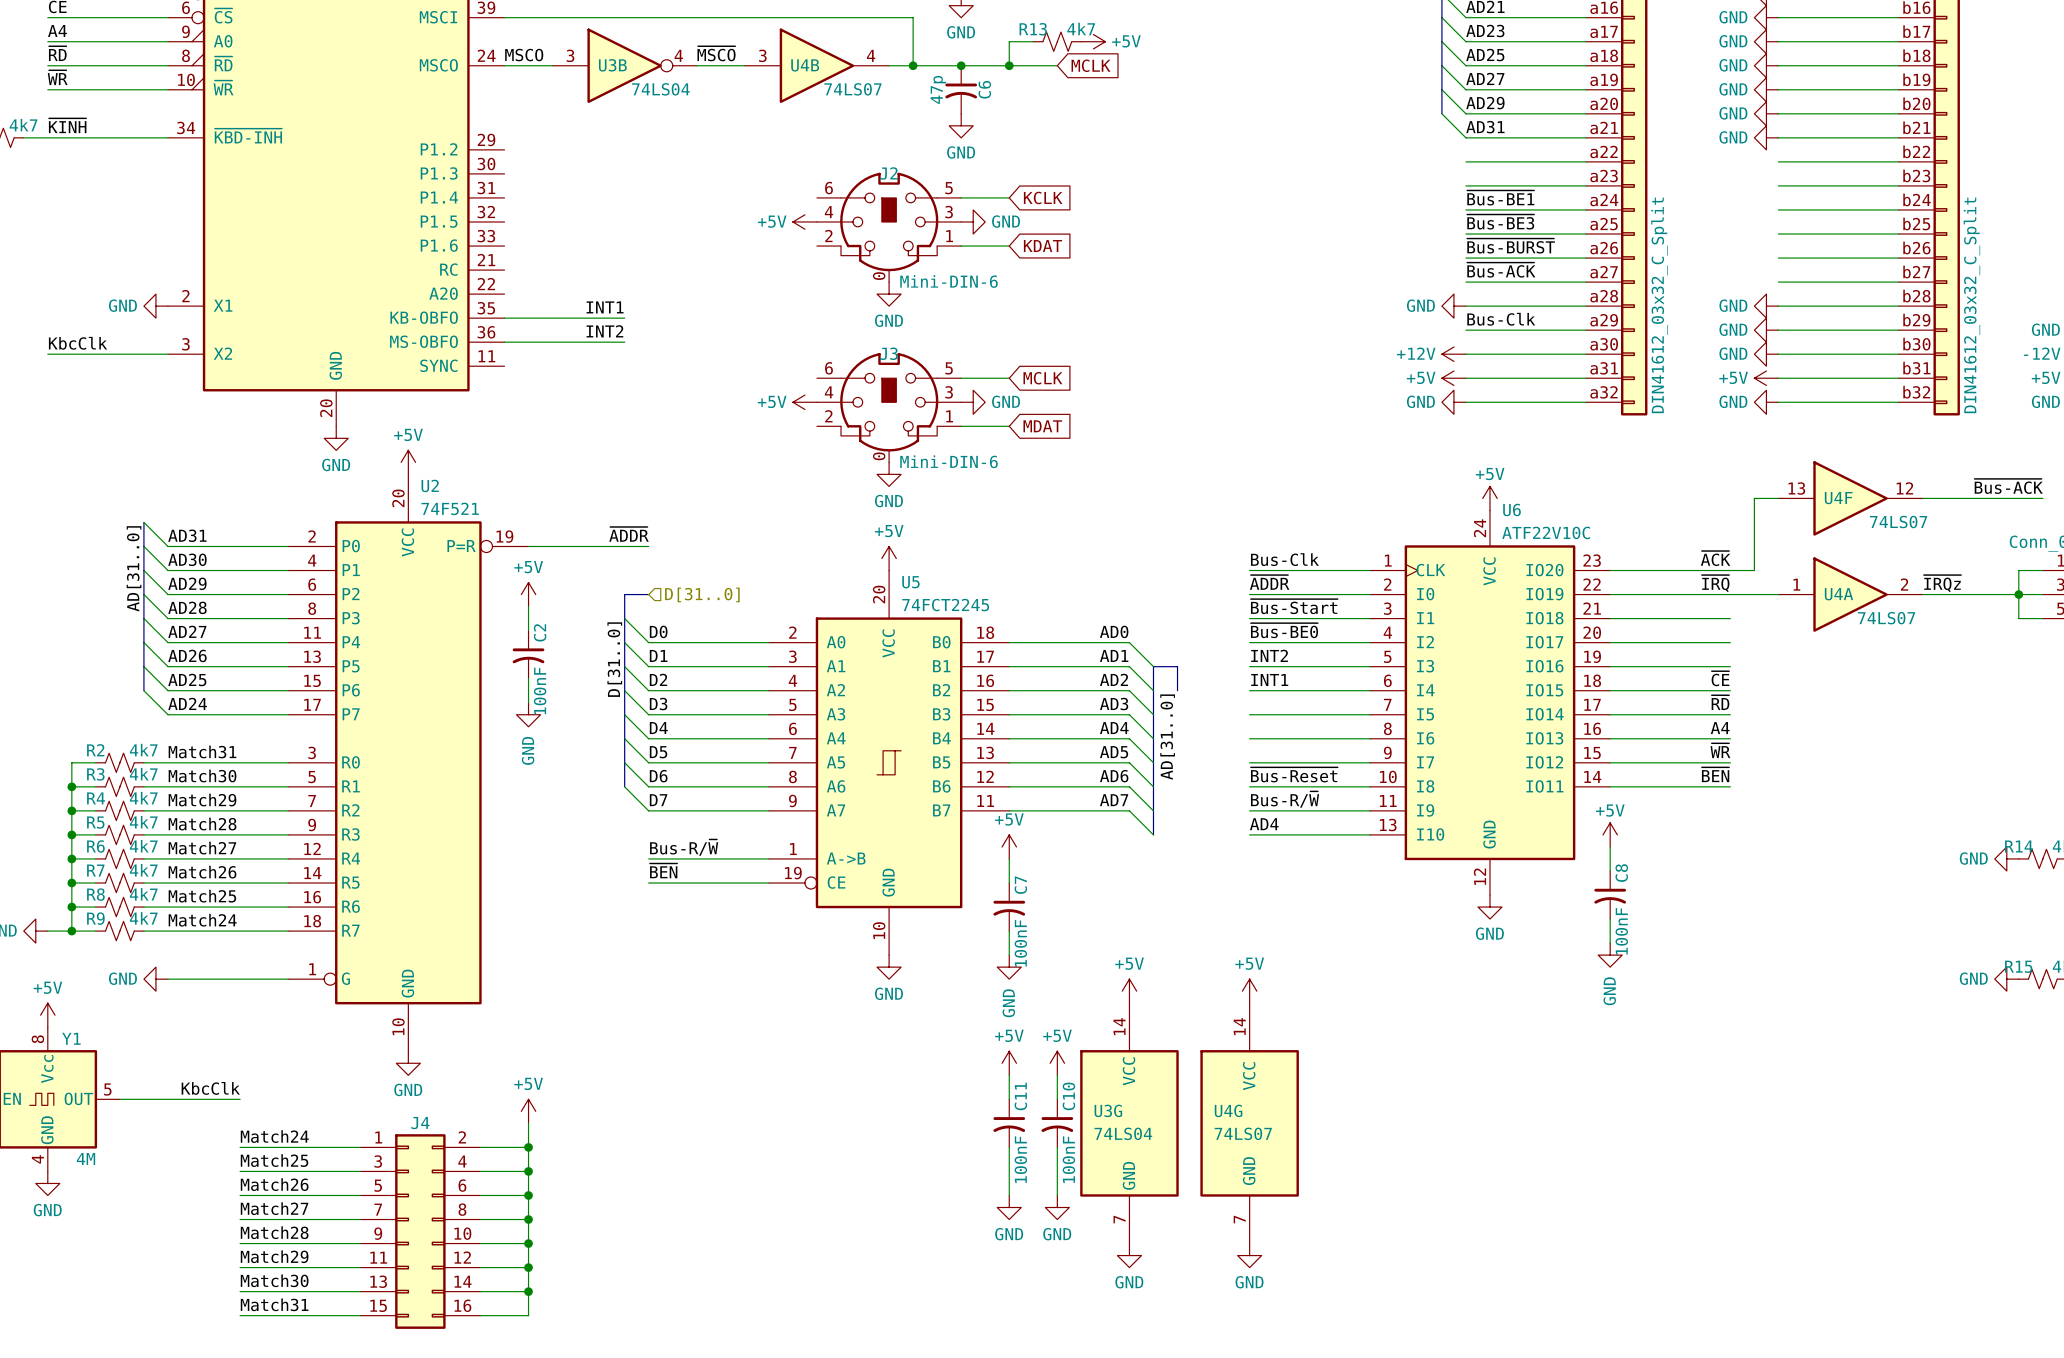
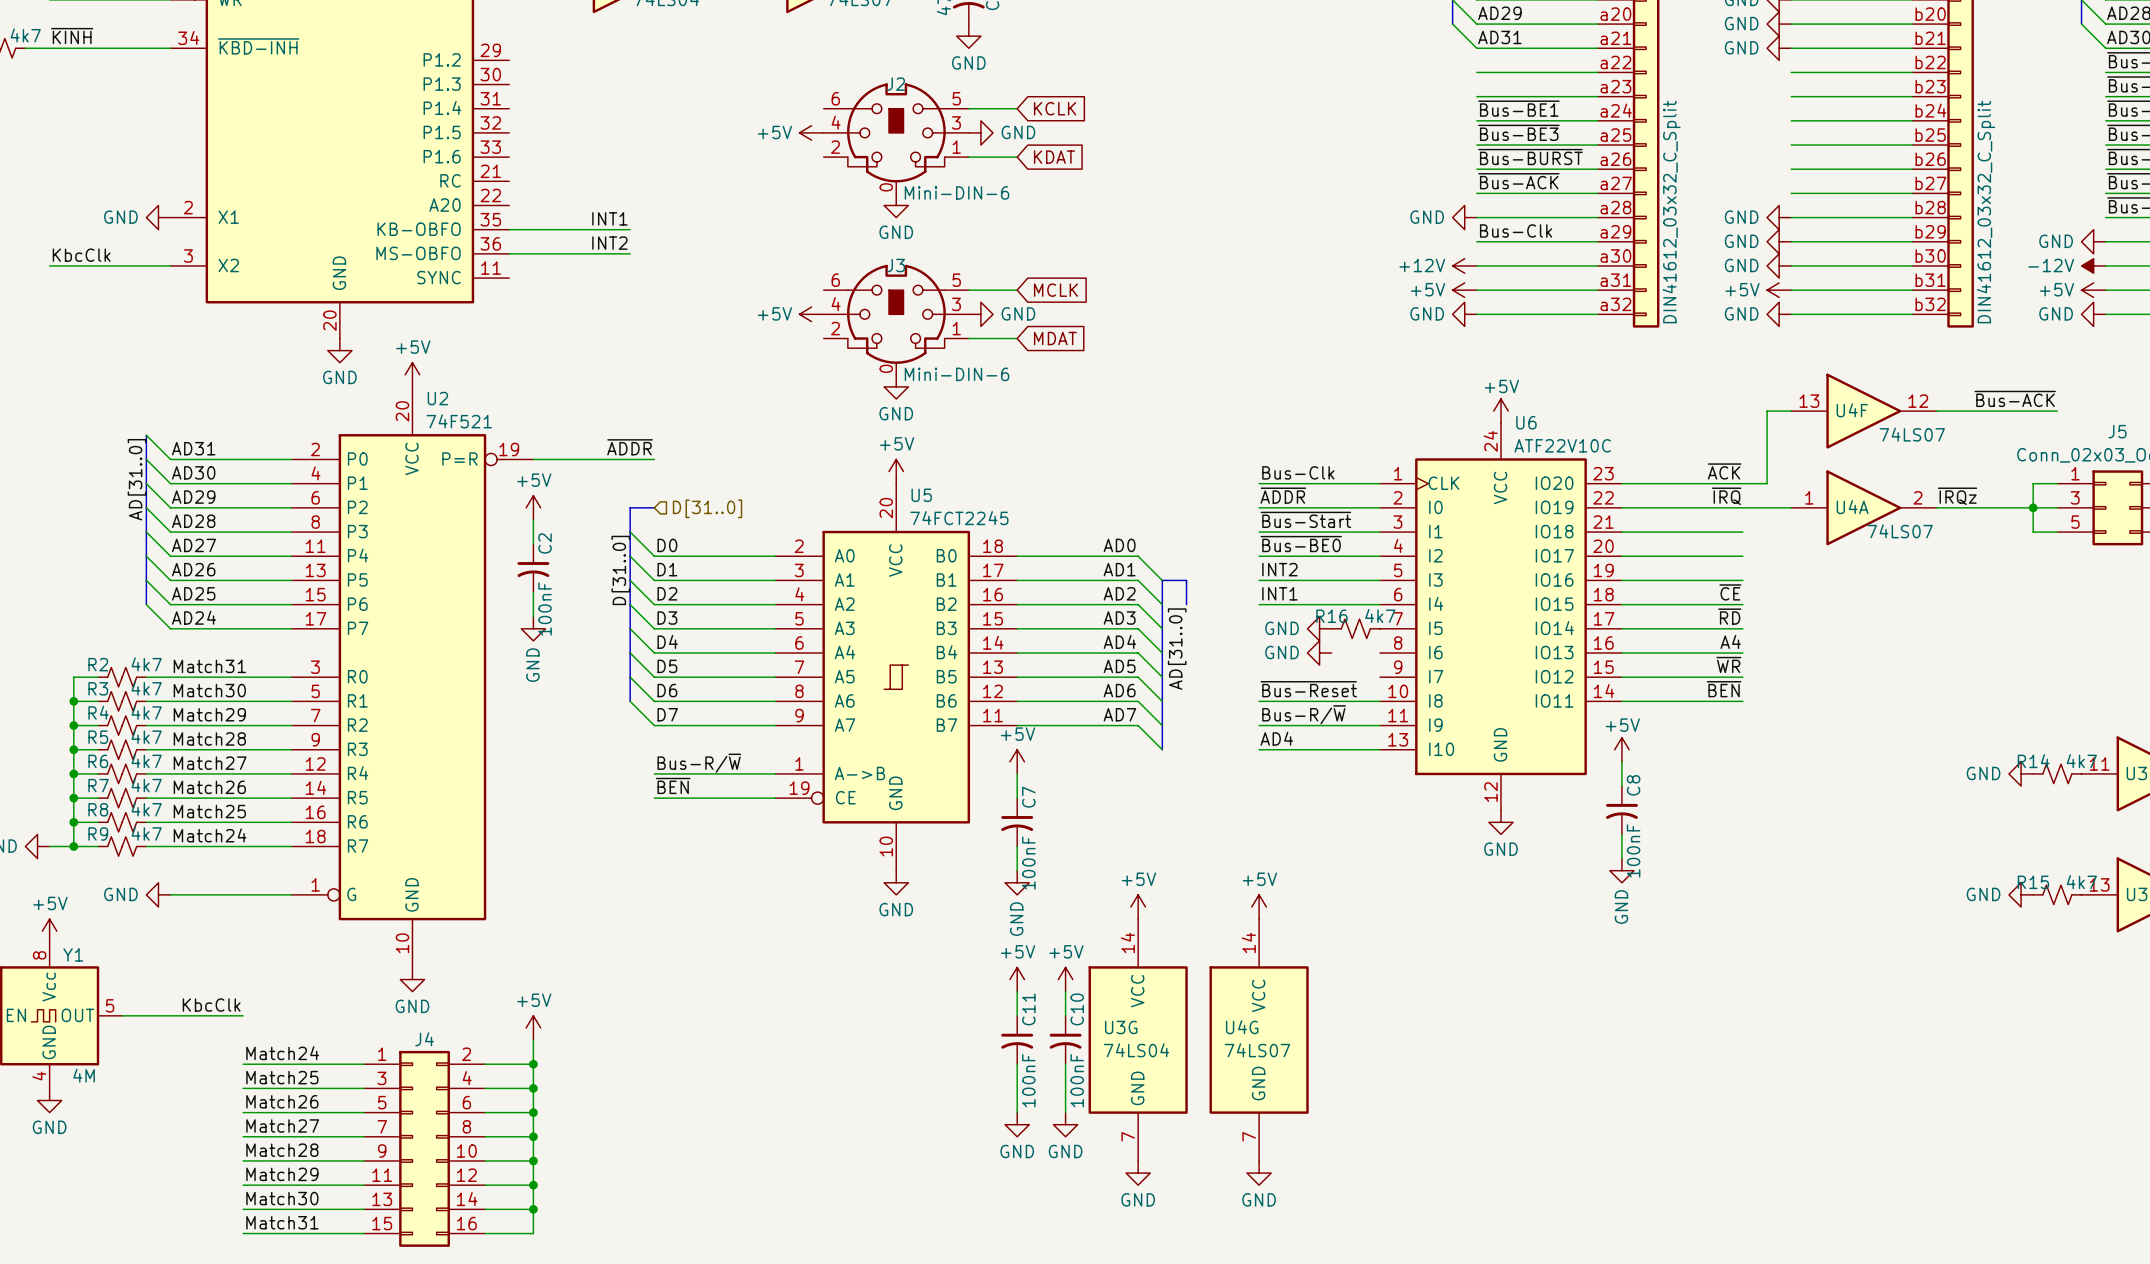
wire: (1249, 714) (1369, 714) -> none
power symbol: none -> GND (1319, 628)
R16: none -> 4k7 (1355, 628)
wire: (1249, 738) (1369, 738) -> none
power symbol: none -> GND (1319, 652)
wire: (1249, 762) (1369, 762) -> none

